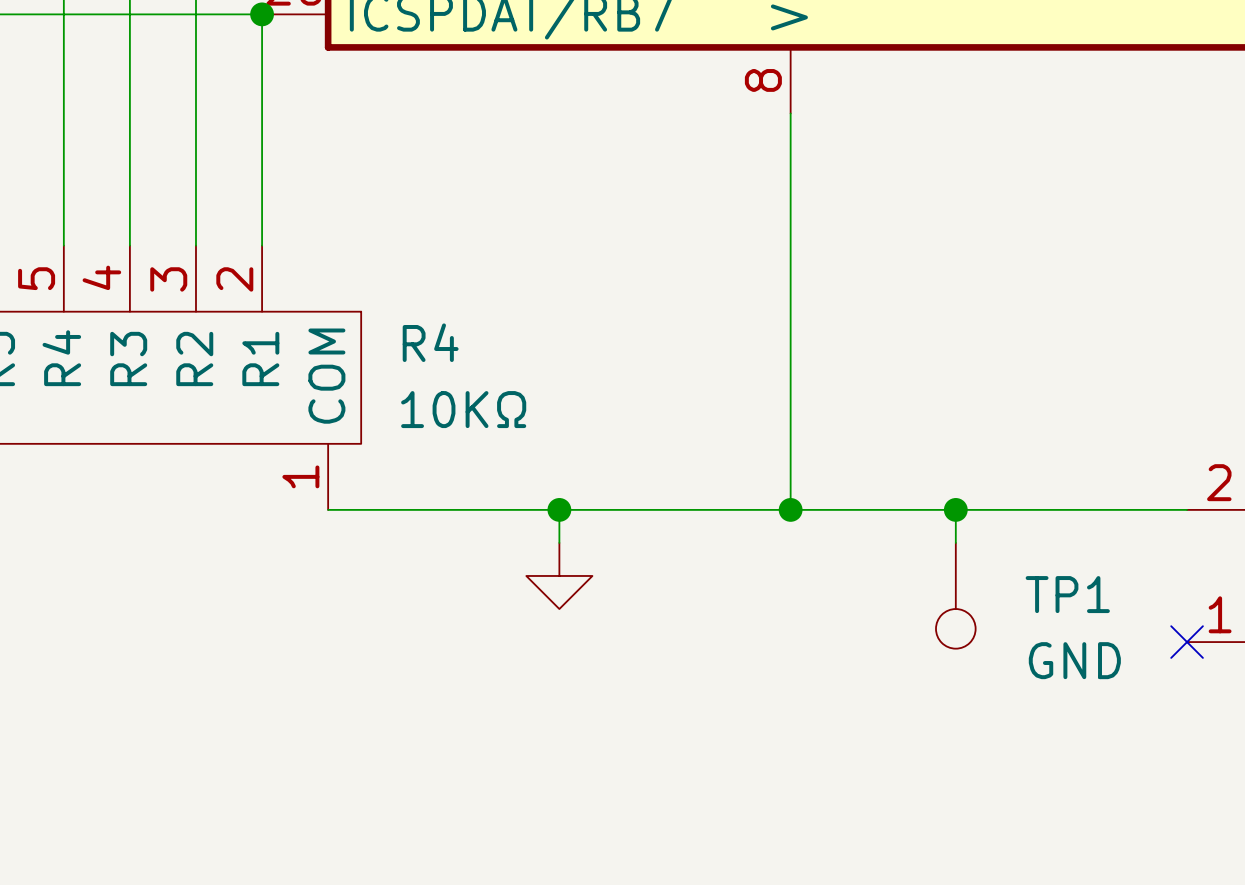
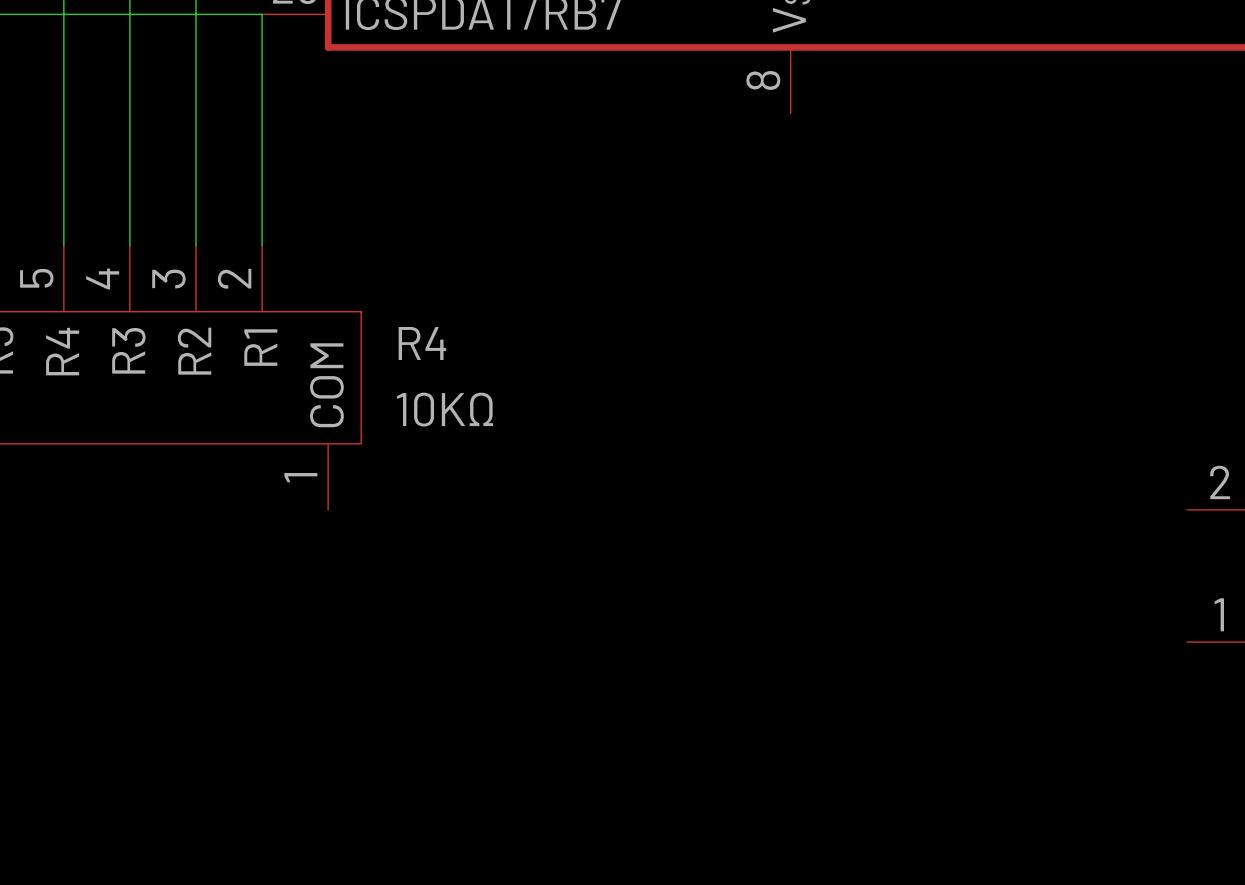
junction: (262, 14) -> none
wire: (790, 113) (790, 509) -> none
wire: (328, 509) (1187, 509) -> none
wire: (559, 509) (559, 542) -> none
junction: (559, 509) -> none
junction: (790, 509) -> none
wire: (955, 509) (955, 542) -> none
junction: (955, 509) -> none
power symbol: (559, 575) -> none
TP1: GND (955, 595) -> none
no-connect mark: (1187, 642) -> none

